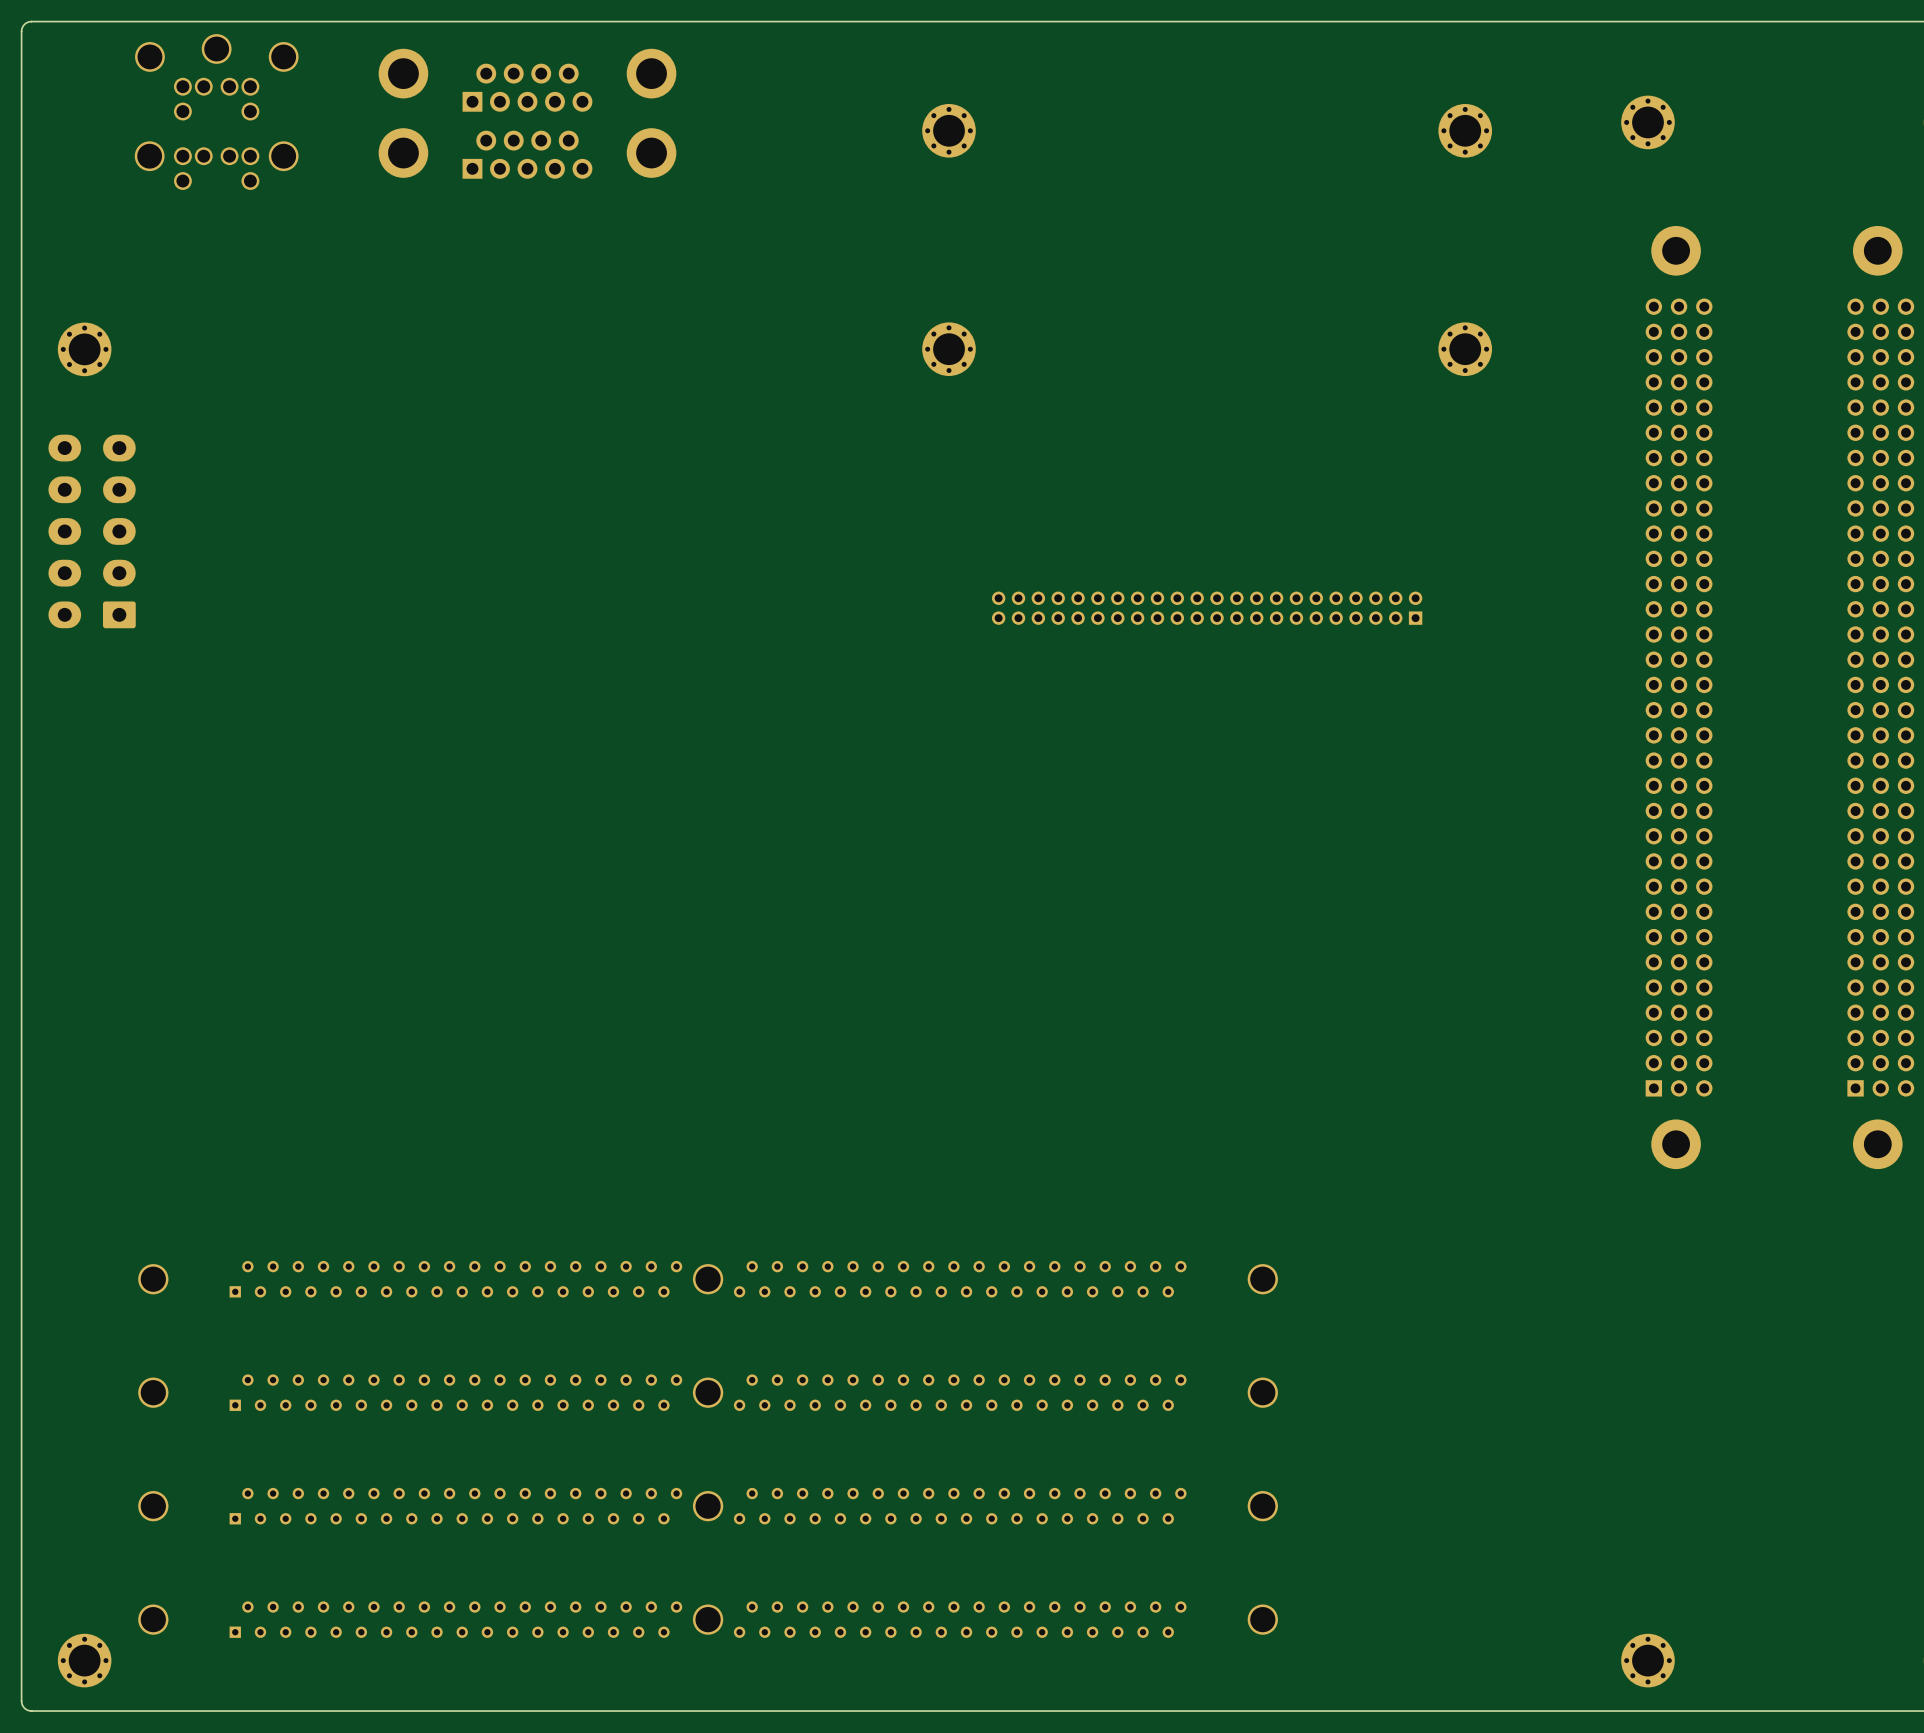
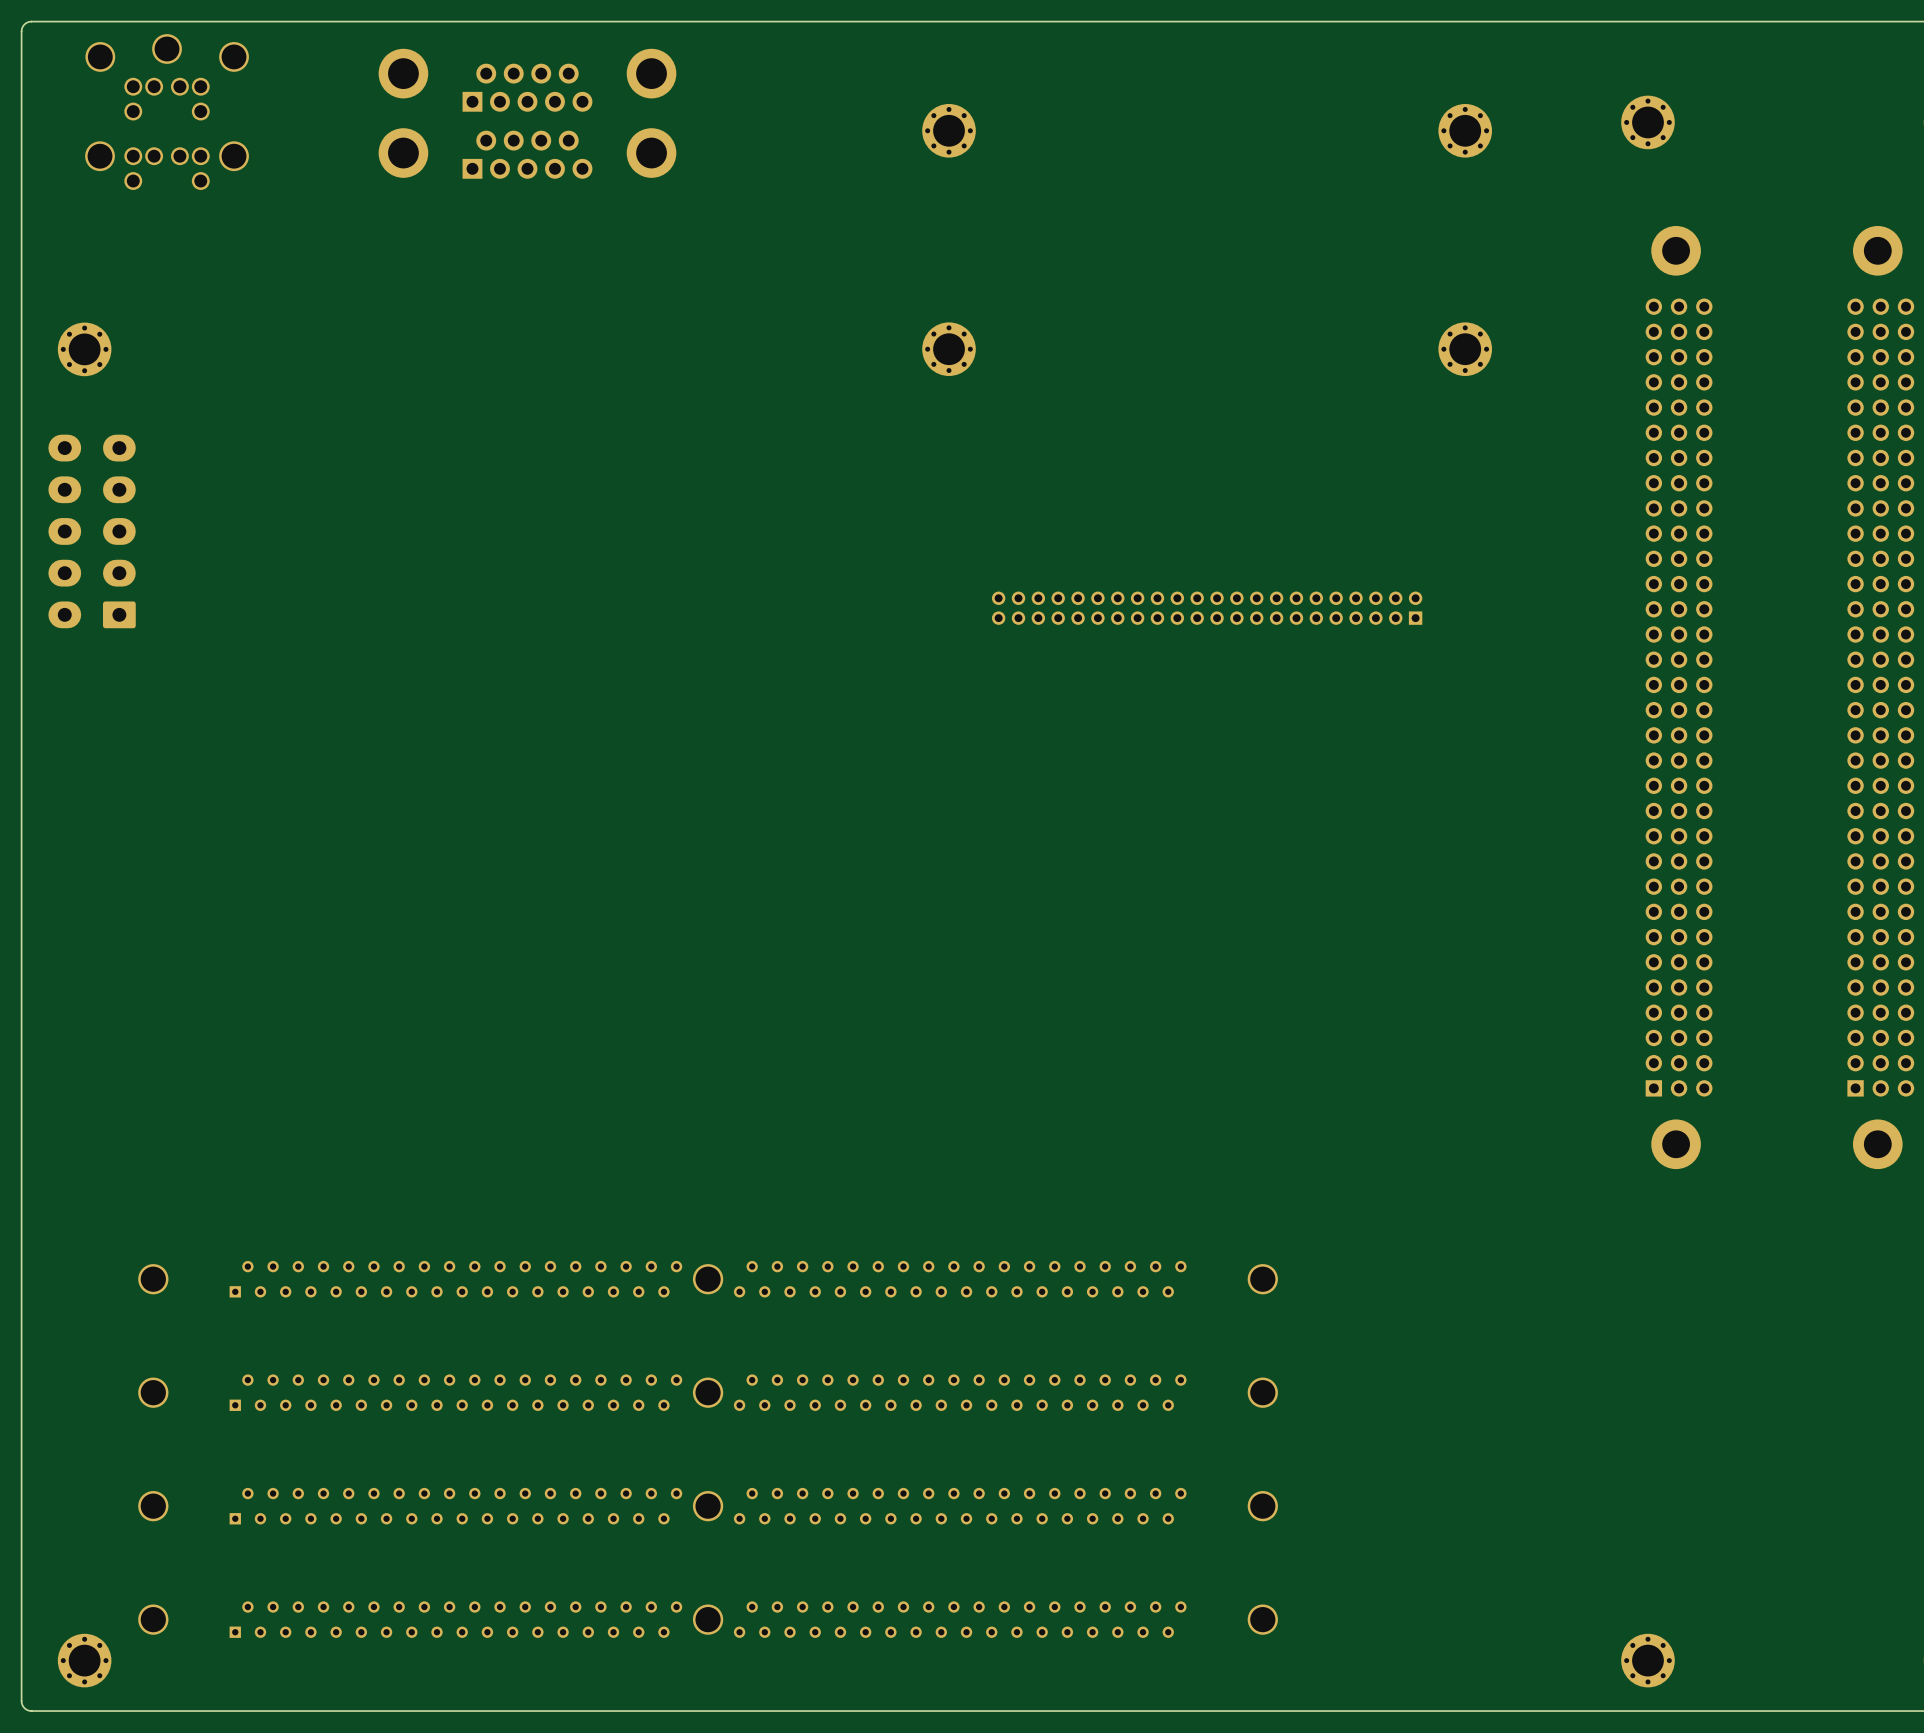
part position: (216, 112) -> (167, 112)

